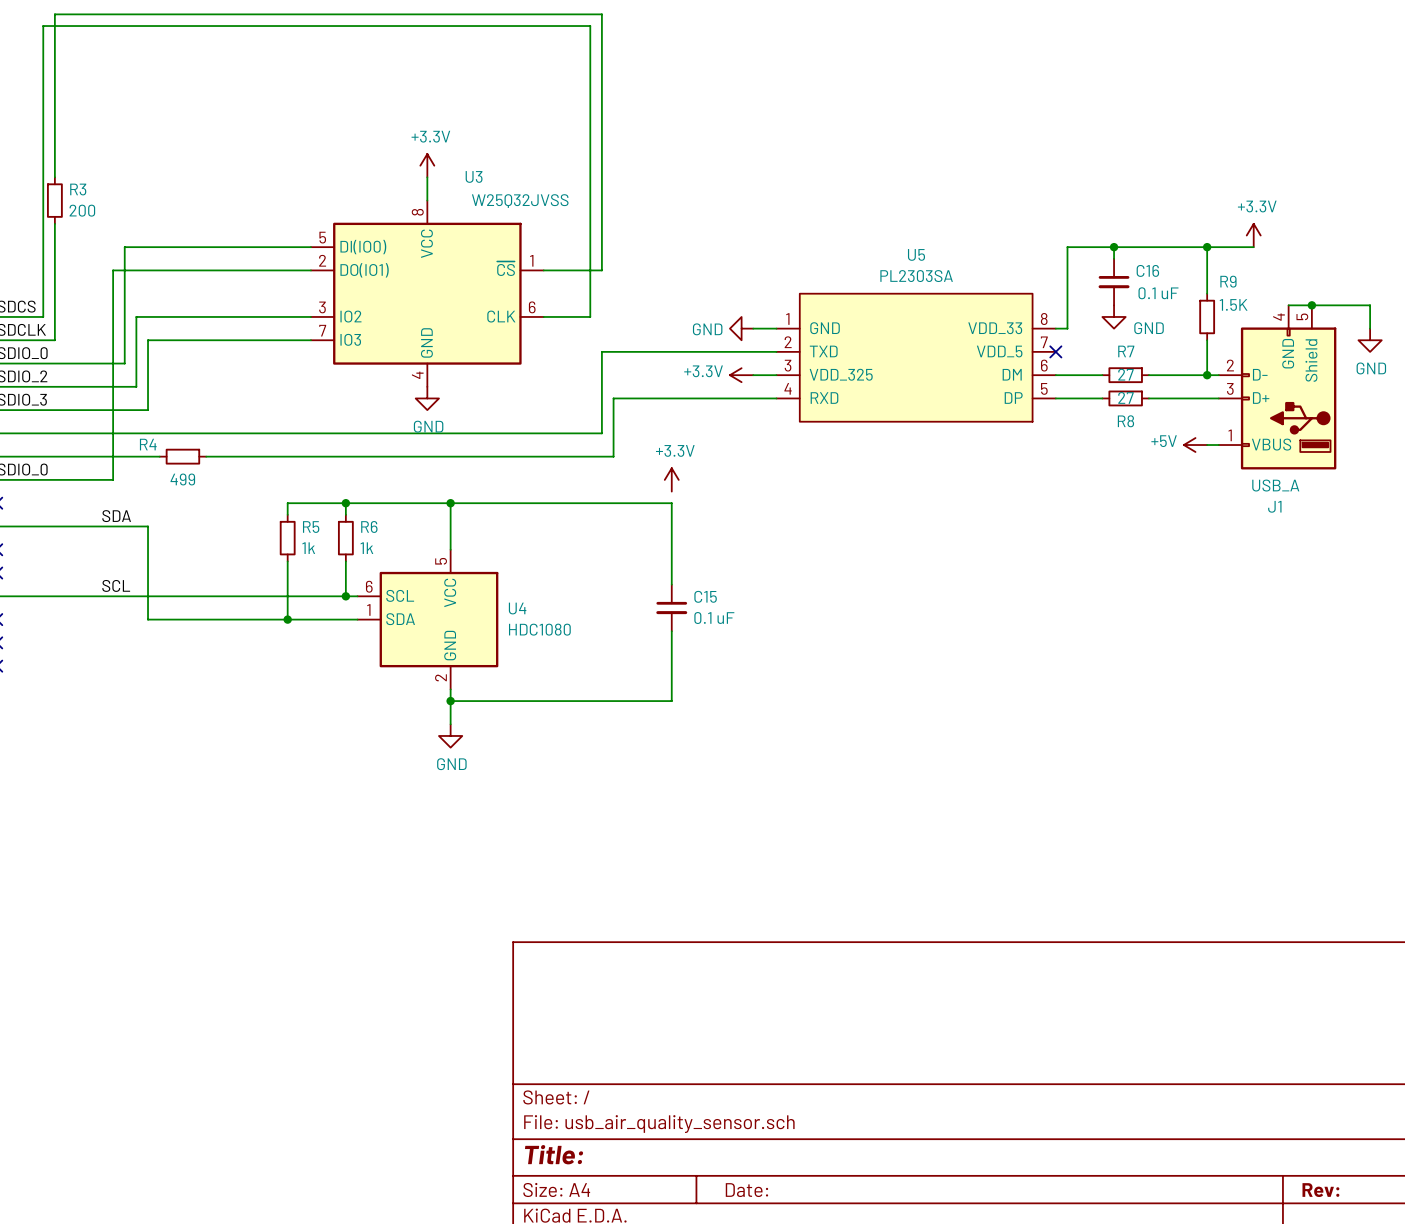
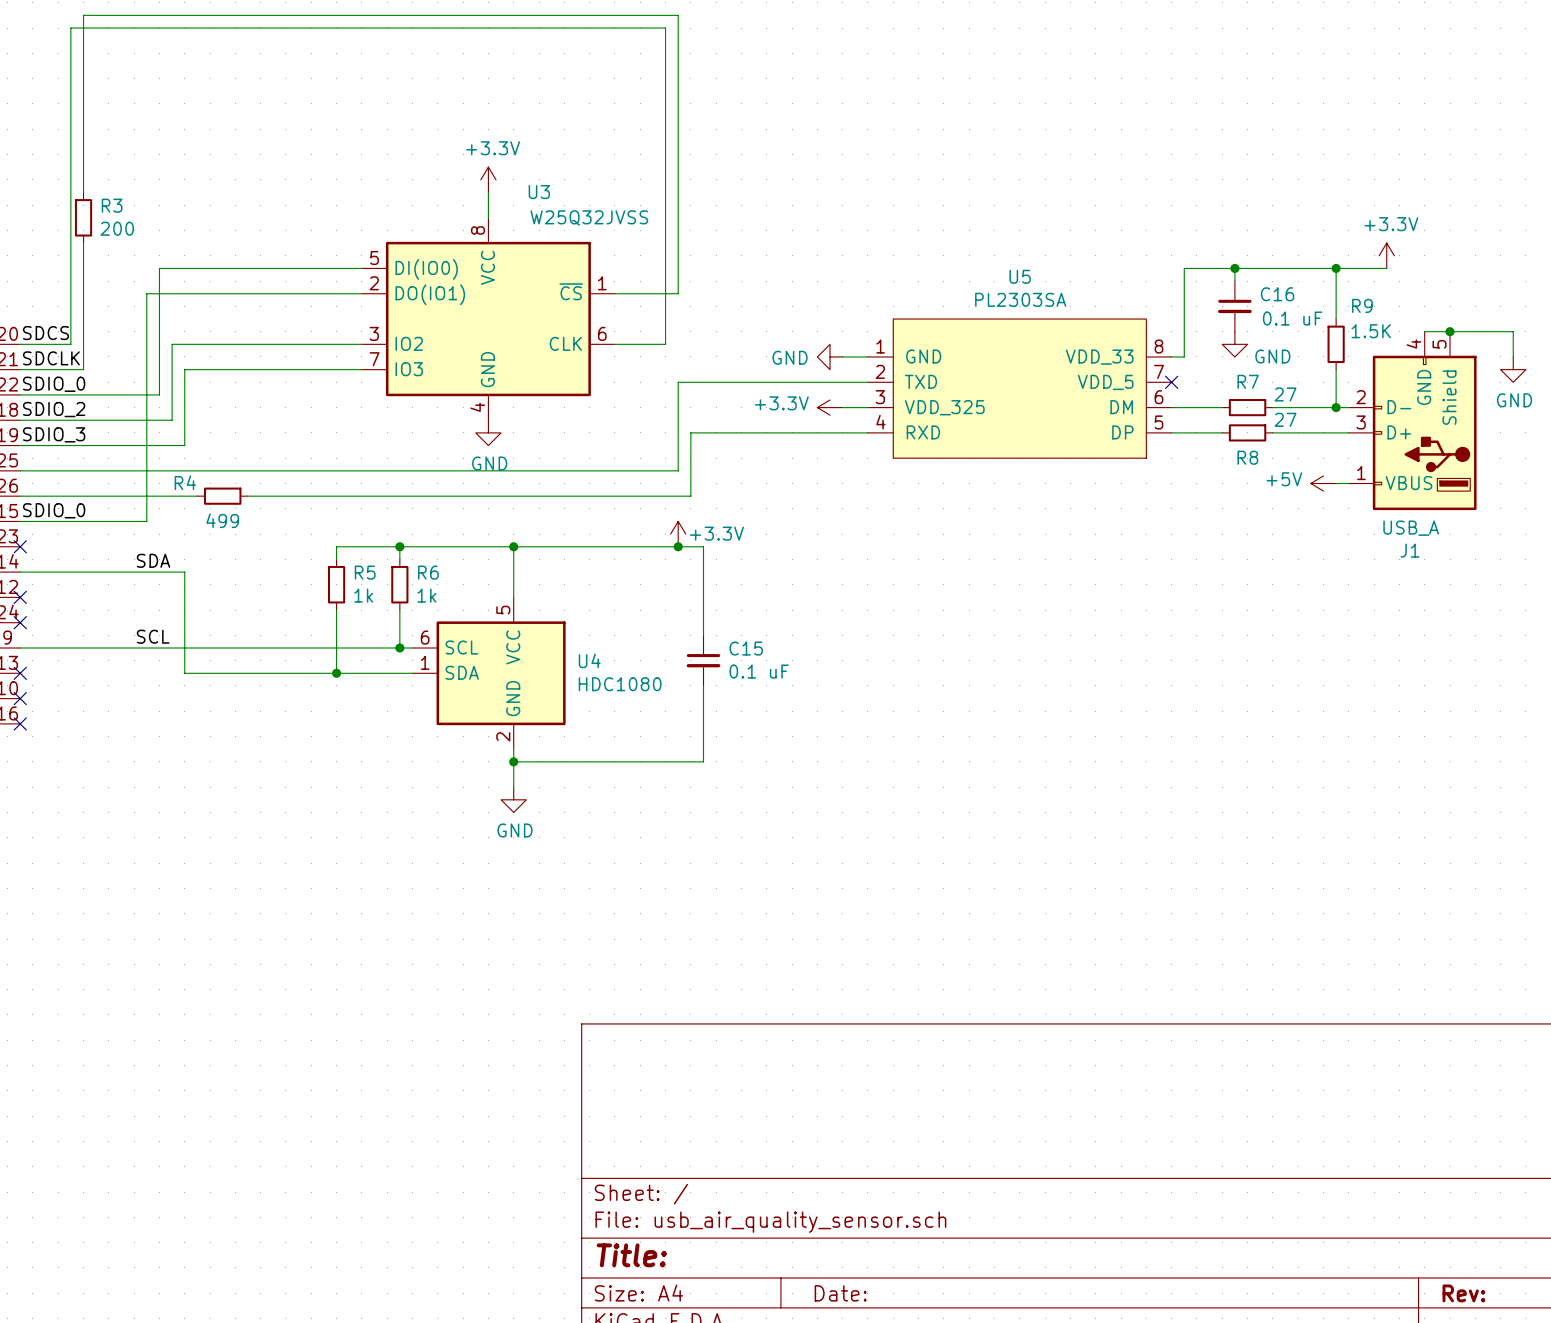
R7 value position: 27 (1125, 374) -> 27 (1285, 394)
R8 value position: 27 (1125, 397) -> 27 (1285, 419)
power symbol text position: +3.3V (675, 450) -> +3.3V (717, 533)
power symbol position: +3.3V (671, 479) -> +3.3V (678, 534)
junction: none -> (678, 546)
wire: (625, 503) (671, 503) (671, 584) -> (703, 546) (703, 635)
C15 position: (671, 607) -> (703, 660)
wire: (671, 631) (671, 701) (625, 701) -> (703, 685) (703, 761)

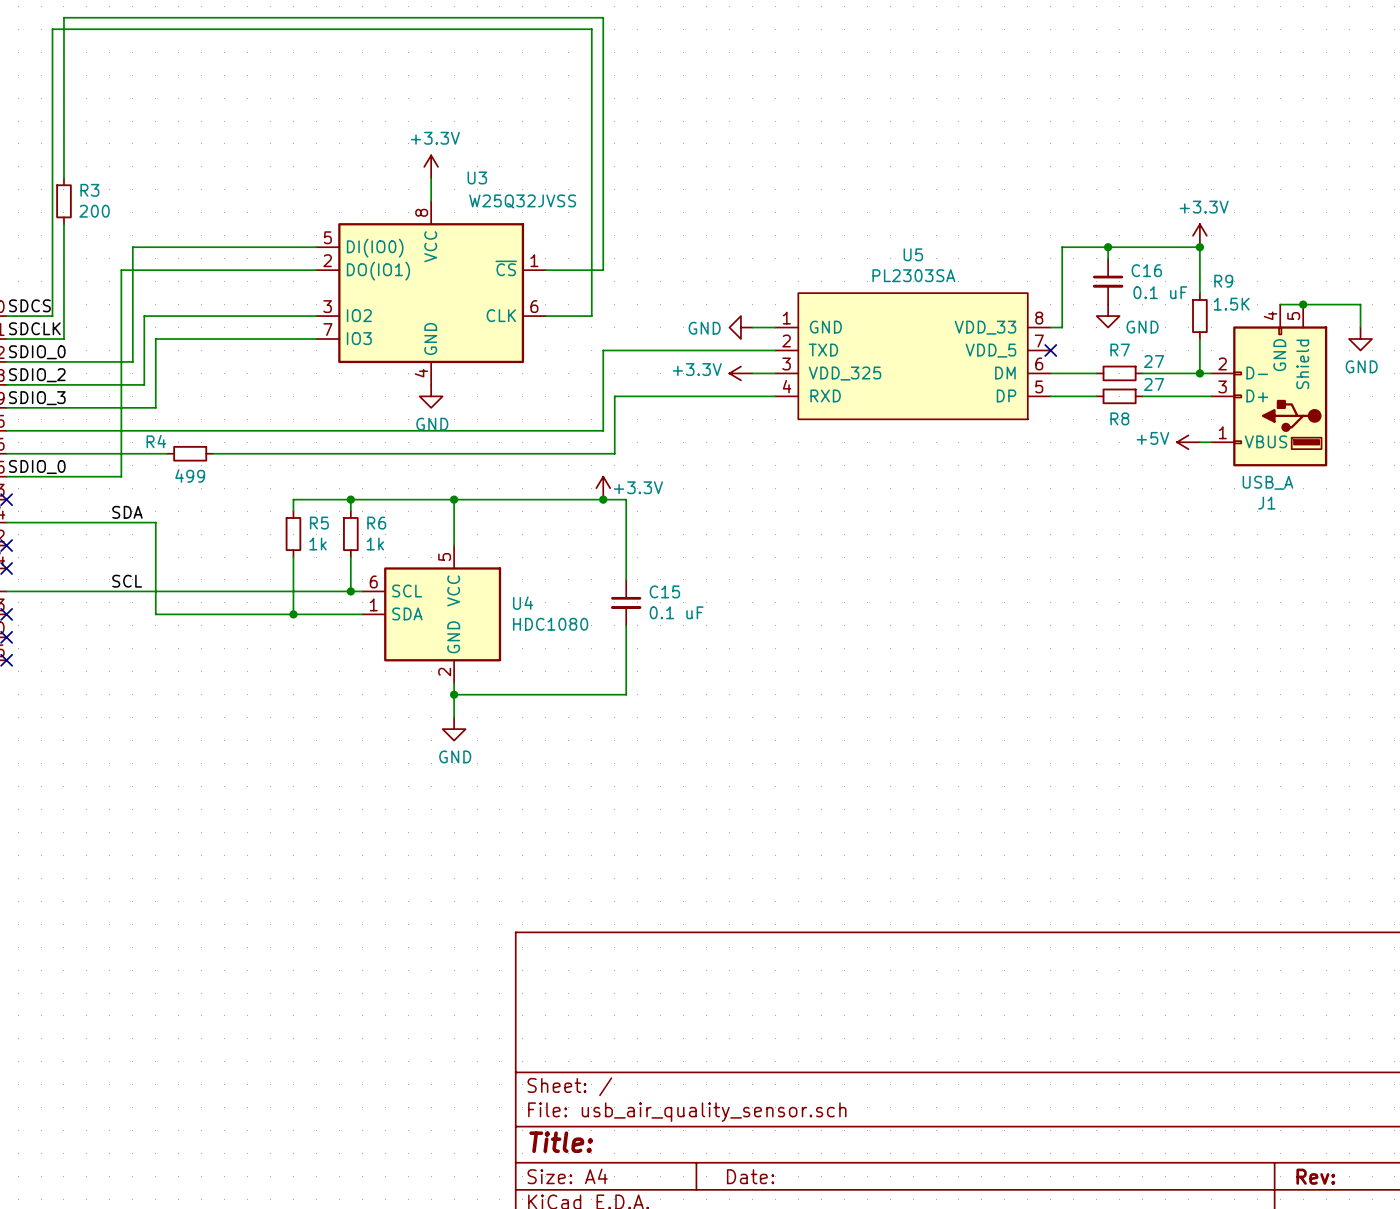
power symbol position: +3.3V (1386, 255) -> +3.3V (1199, 235)
wire: (1336, 268) (1386, 268) -> none

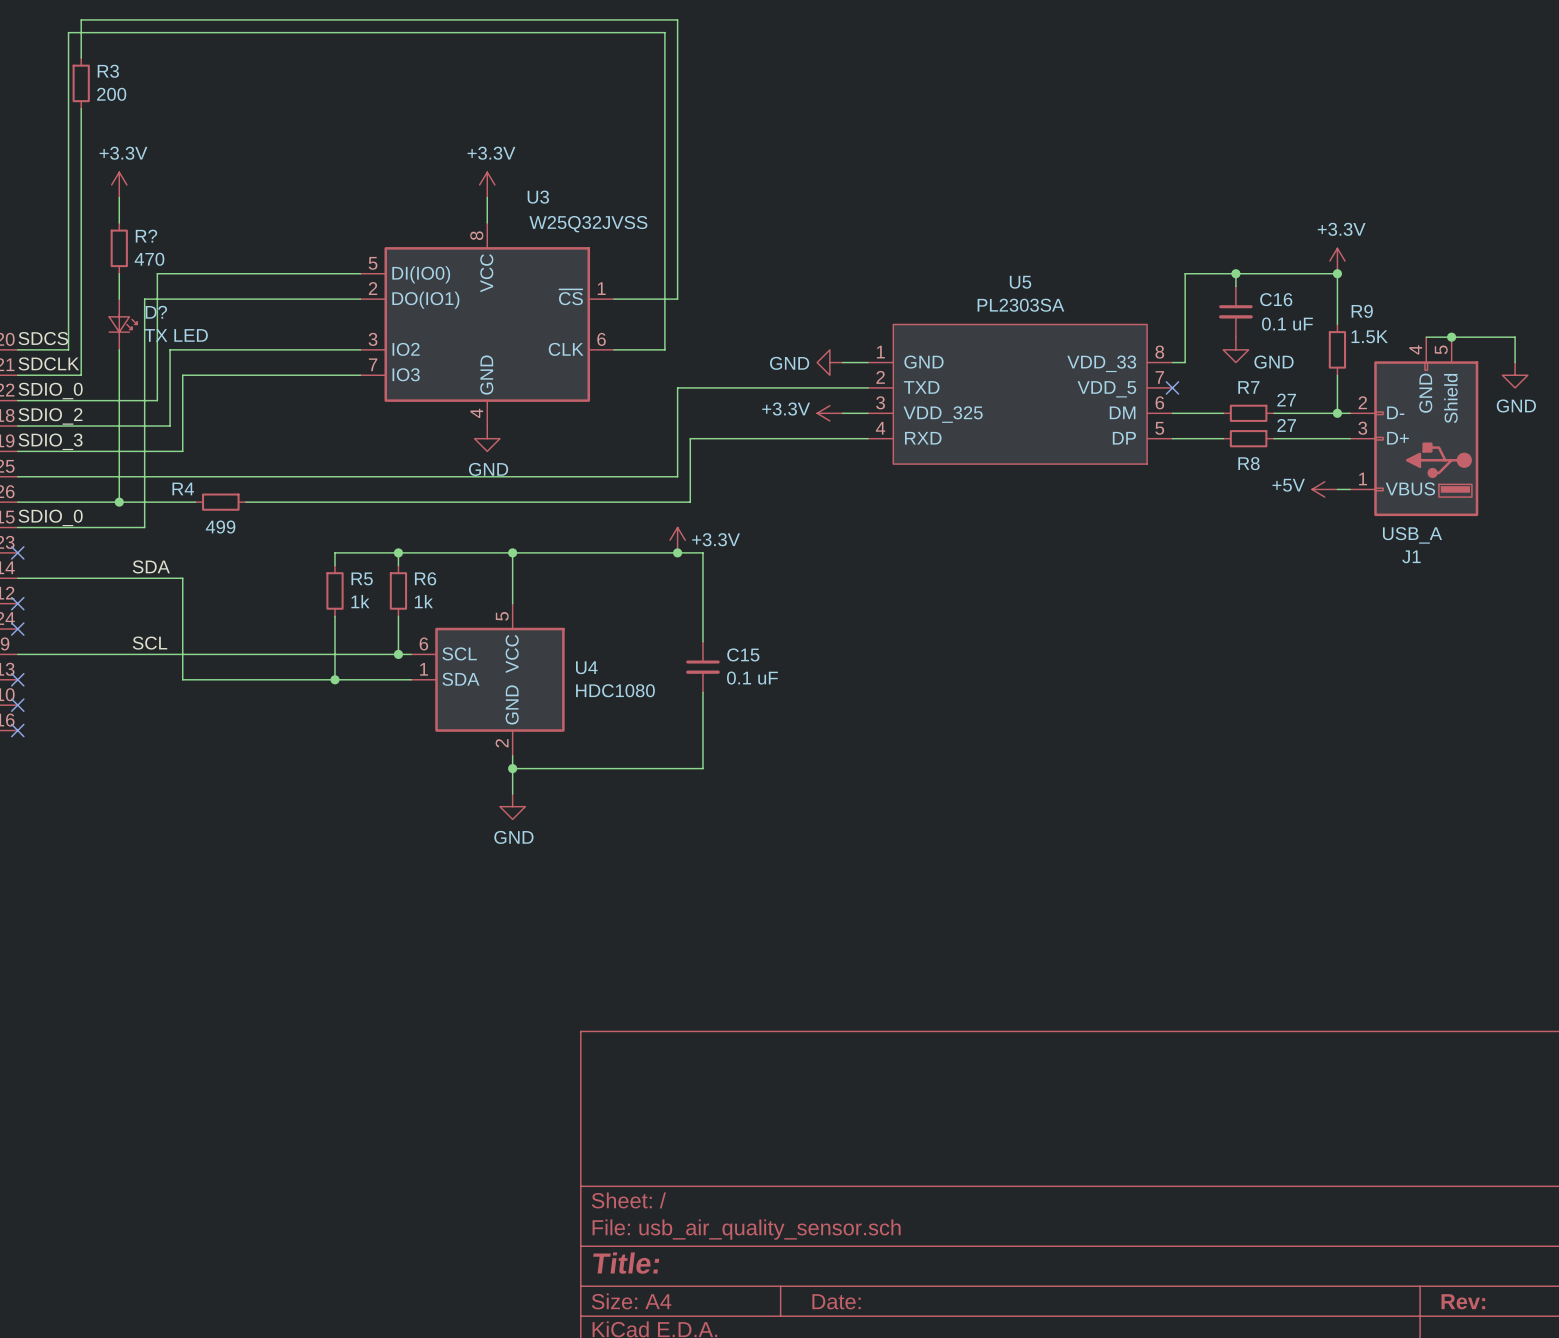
wire: (63, 52) (63, 98) -> (81, 197) (81, 248)
power symbol: none -> +3.3V (119, 184)
wire: none -> (119, 197) (119, 222)
R3 position: (63, 201) -> (81, 83)
R?: none -> 470 (119, 248)
wire: none -> (119, 273) (119, 299)
D?: none -> TX LED (123, 324)
wire: none -> (119, 349) (119, 502)
junction: none -> (119, 502)

